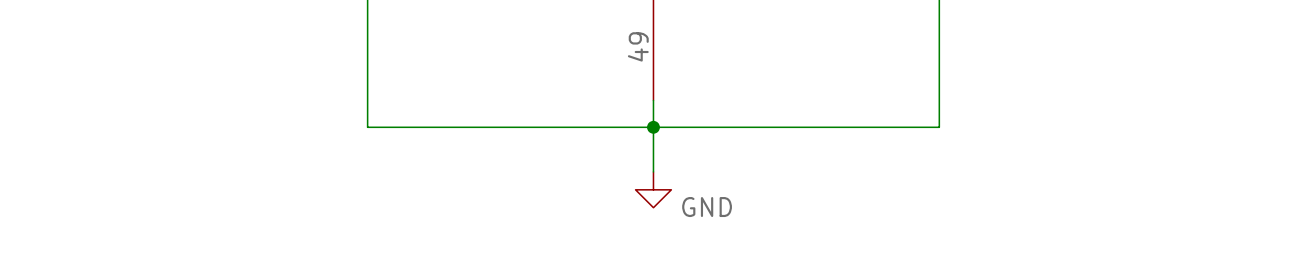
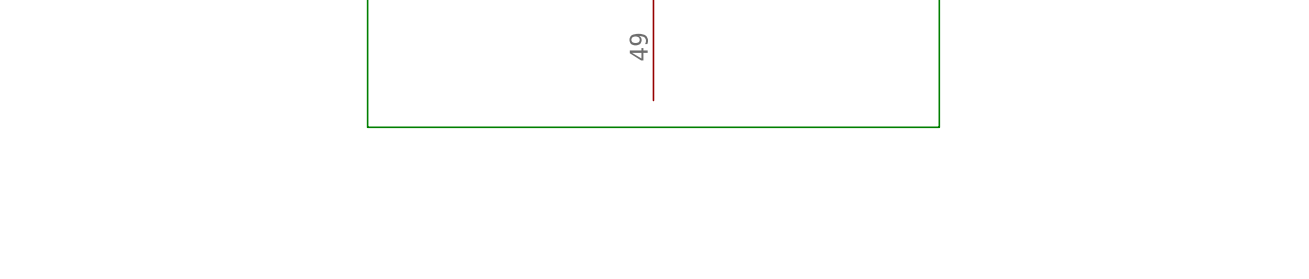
wire: (653, 100) (653, 171) -> none
junction: (653, 127) -> none
power symbol: GND (653, 189) -> none

